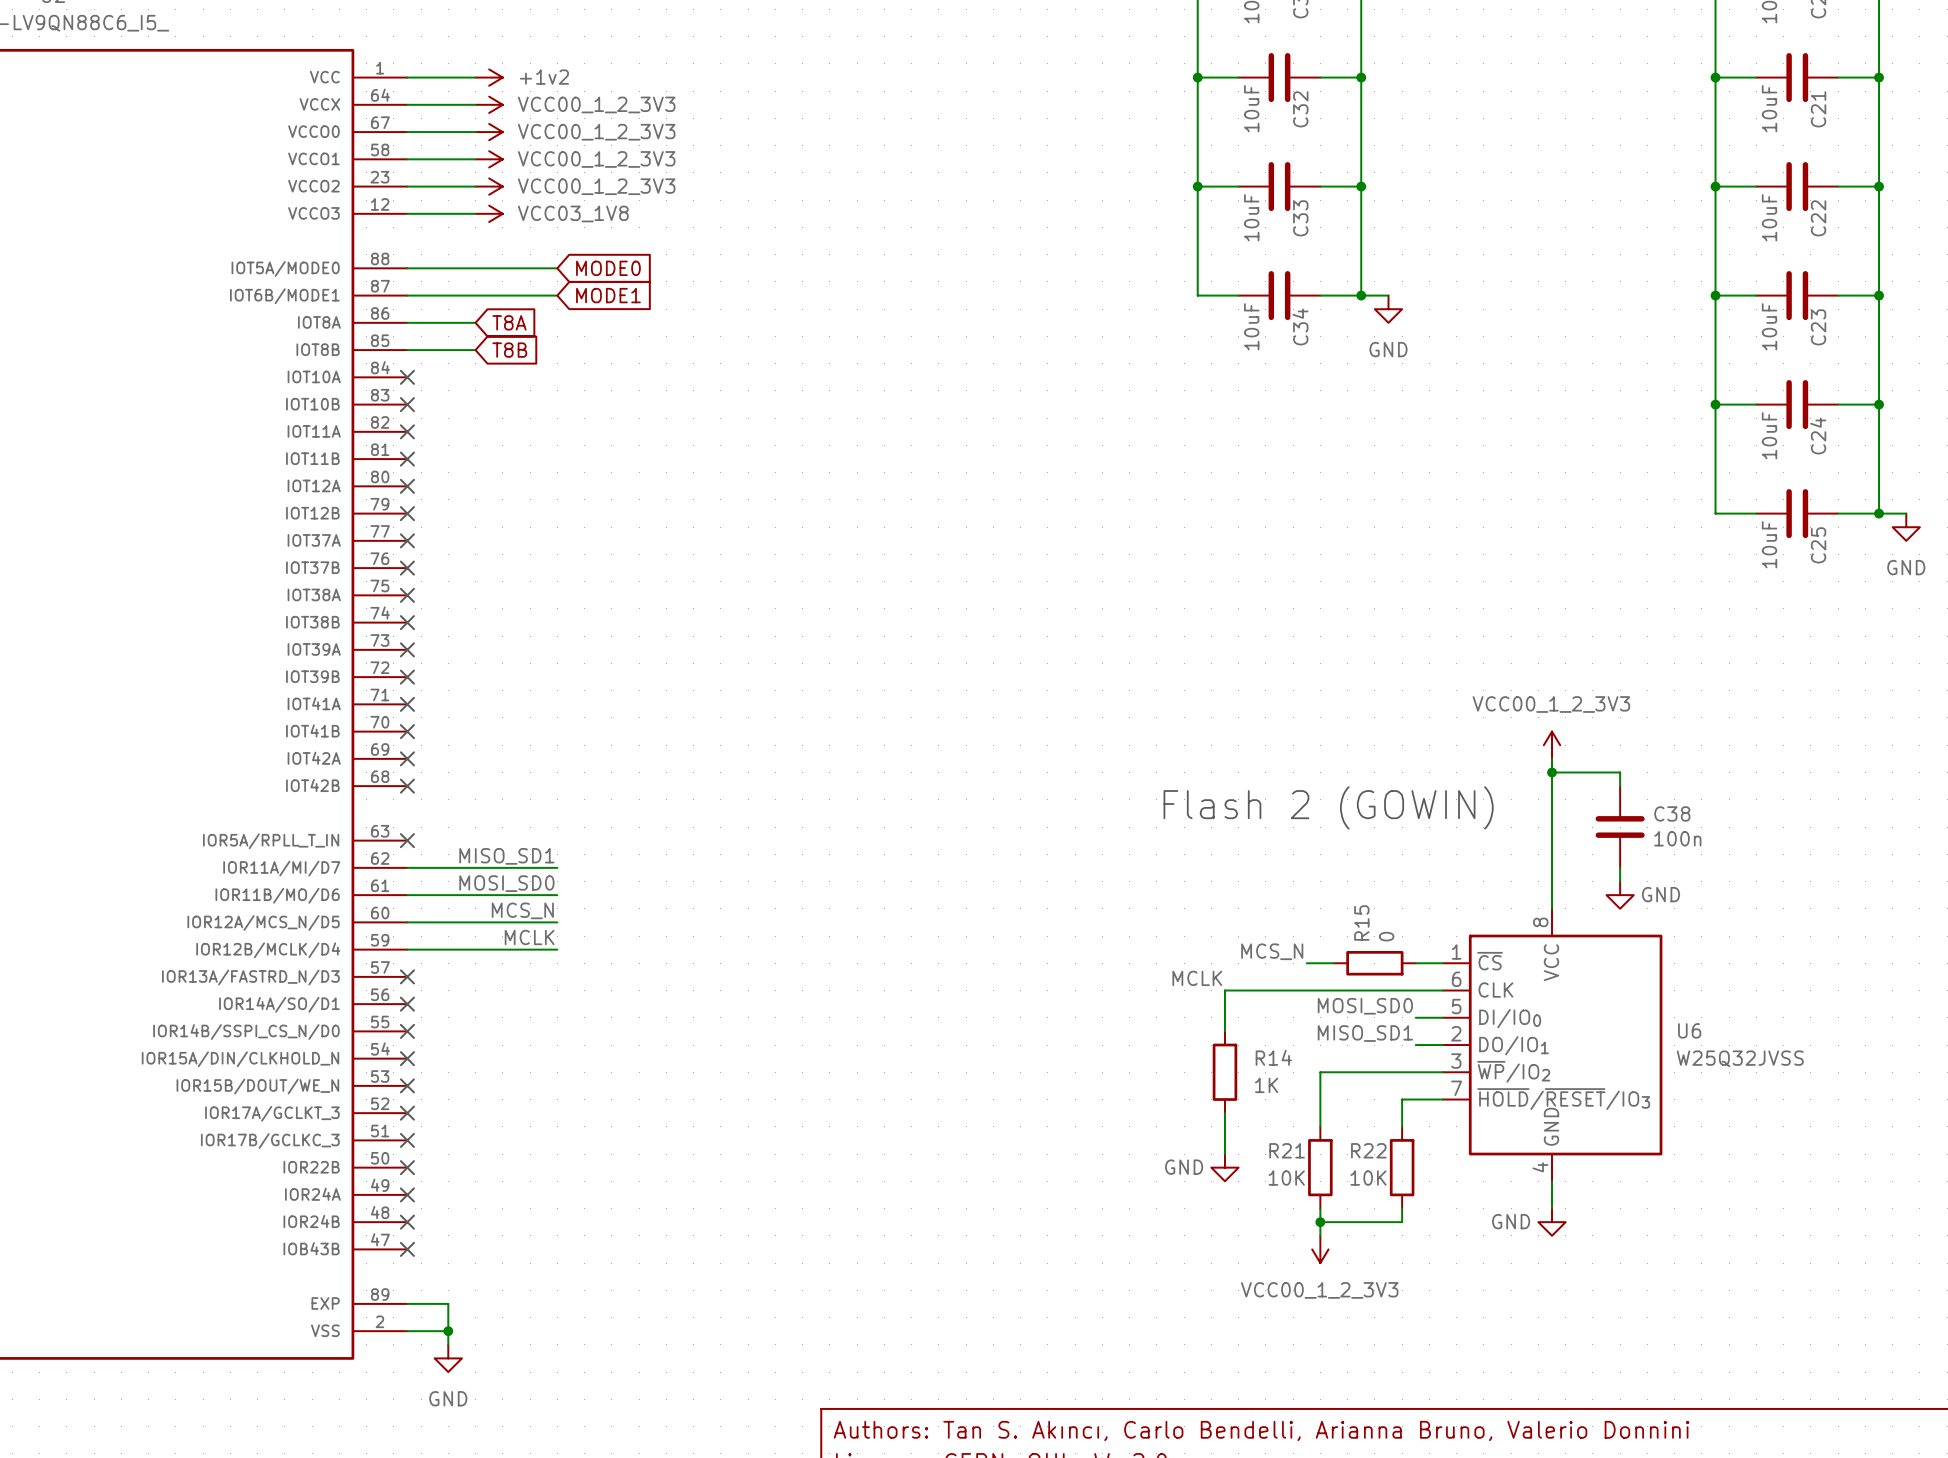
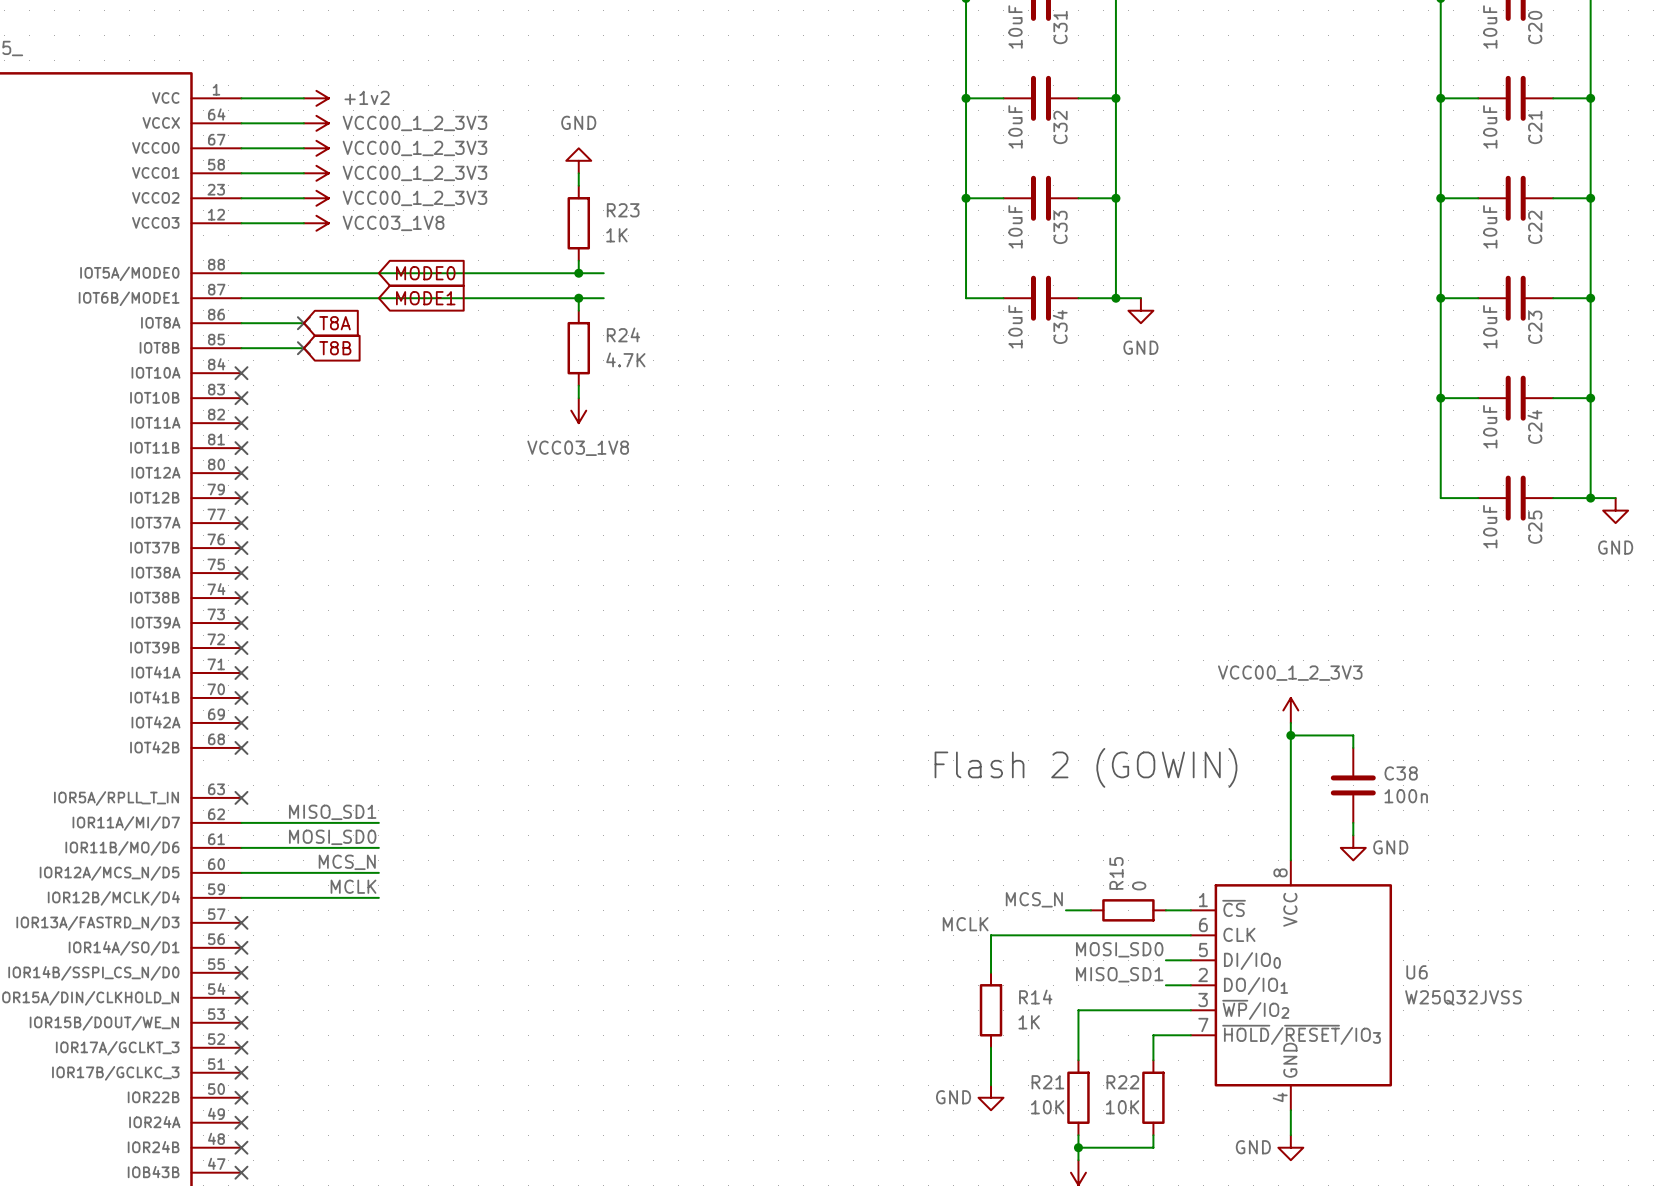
power symbol: none -> GND (578, 160)
wire: none -> (578, 173) (578, 185)
R23: none -> 1K (578, 223)
wire: none -> (578, 260) (578, 273)
wire: none -> (378, 273) (603, 273)
junction: none -> (578, 273)
wire: none -> (378, 298) (603, 298)
wire: none -> (578, 298) (578, 310)
junction: none -> (578, 298)
no-connect mark: none -> (303, 323)
no-connect mark: none -> (303, 348)
R24: none -> 4.7K (578, 348)
wire: none -> (578, 385) (578, 398)
power symbol: none -> VCC03_1V8 (578, 410)

